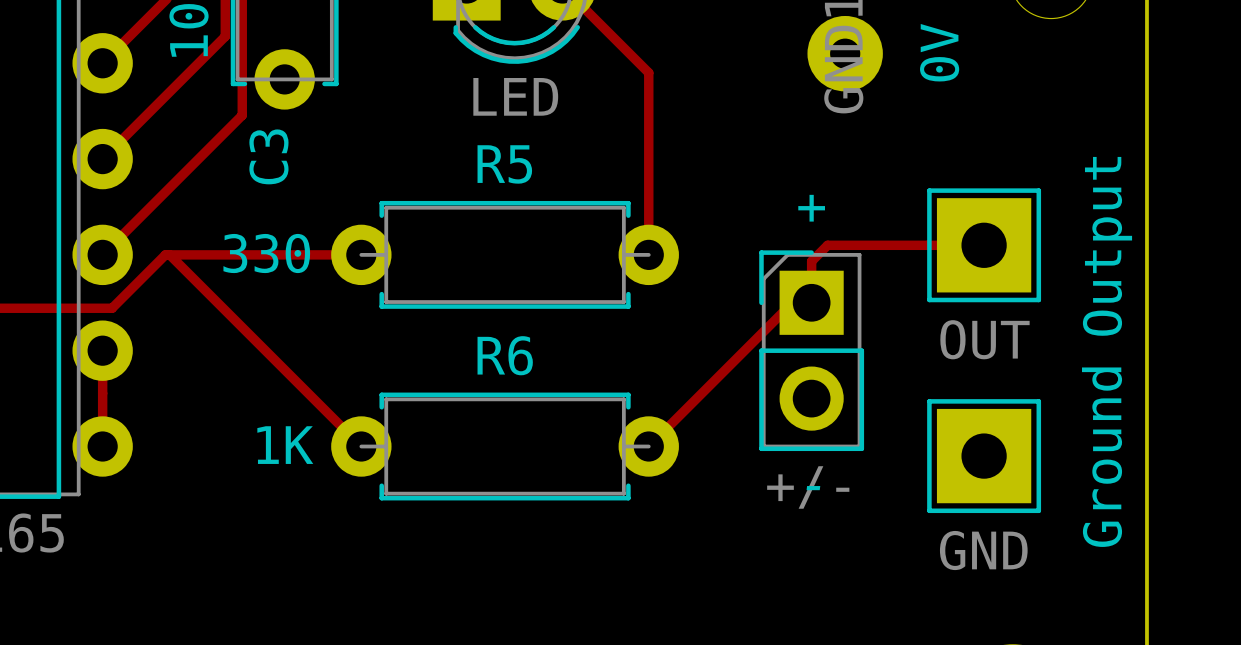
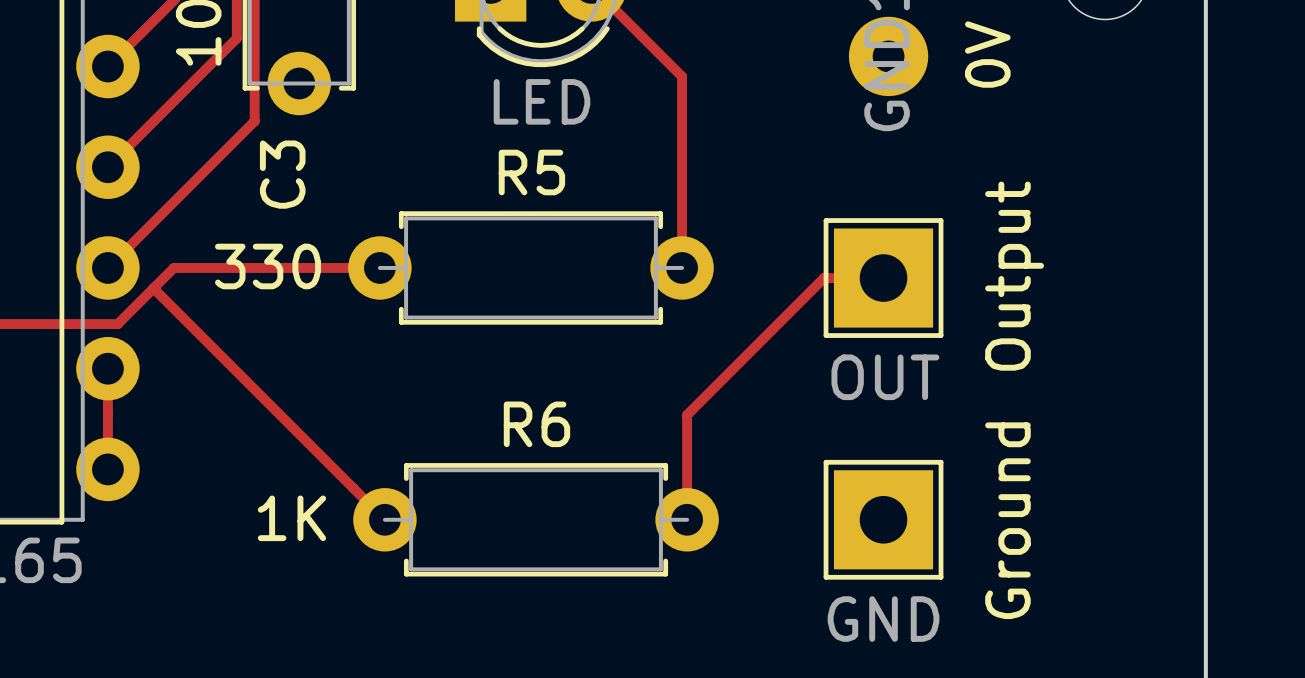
track: (984, 245) (827, 245) (811, 261) (811, 302) (792, 302) (648, 446) -> none
part position: (984, 245) -> (883, 278)
track: (169, 254) (361, 446) -> none
track: none -> (153, 288) (384, 519)
track: none -> (873, 288) (883, 278) (824, 278) (687, 414) (687, 519)
part: +/- (811, 350) -> none
R6 position: (505, 446) -> (536, 519)
part position: (984, 456) -> (883, 519)

